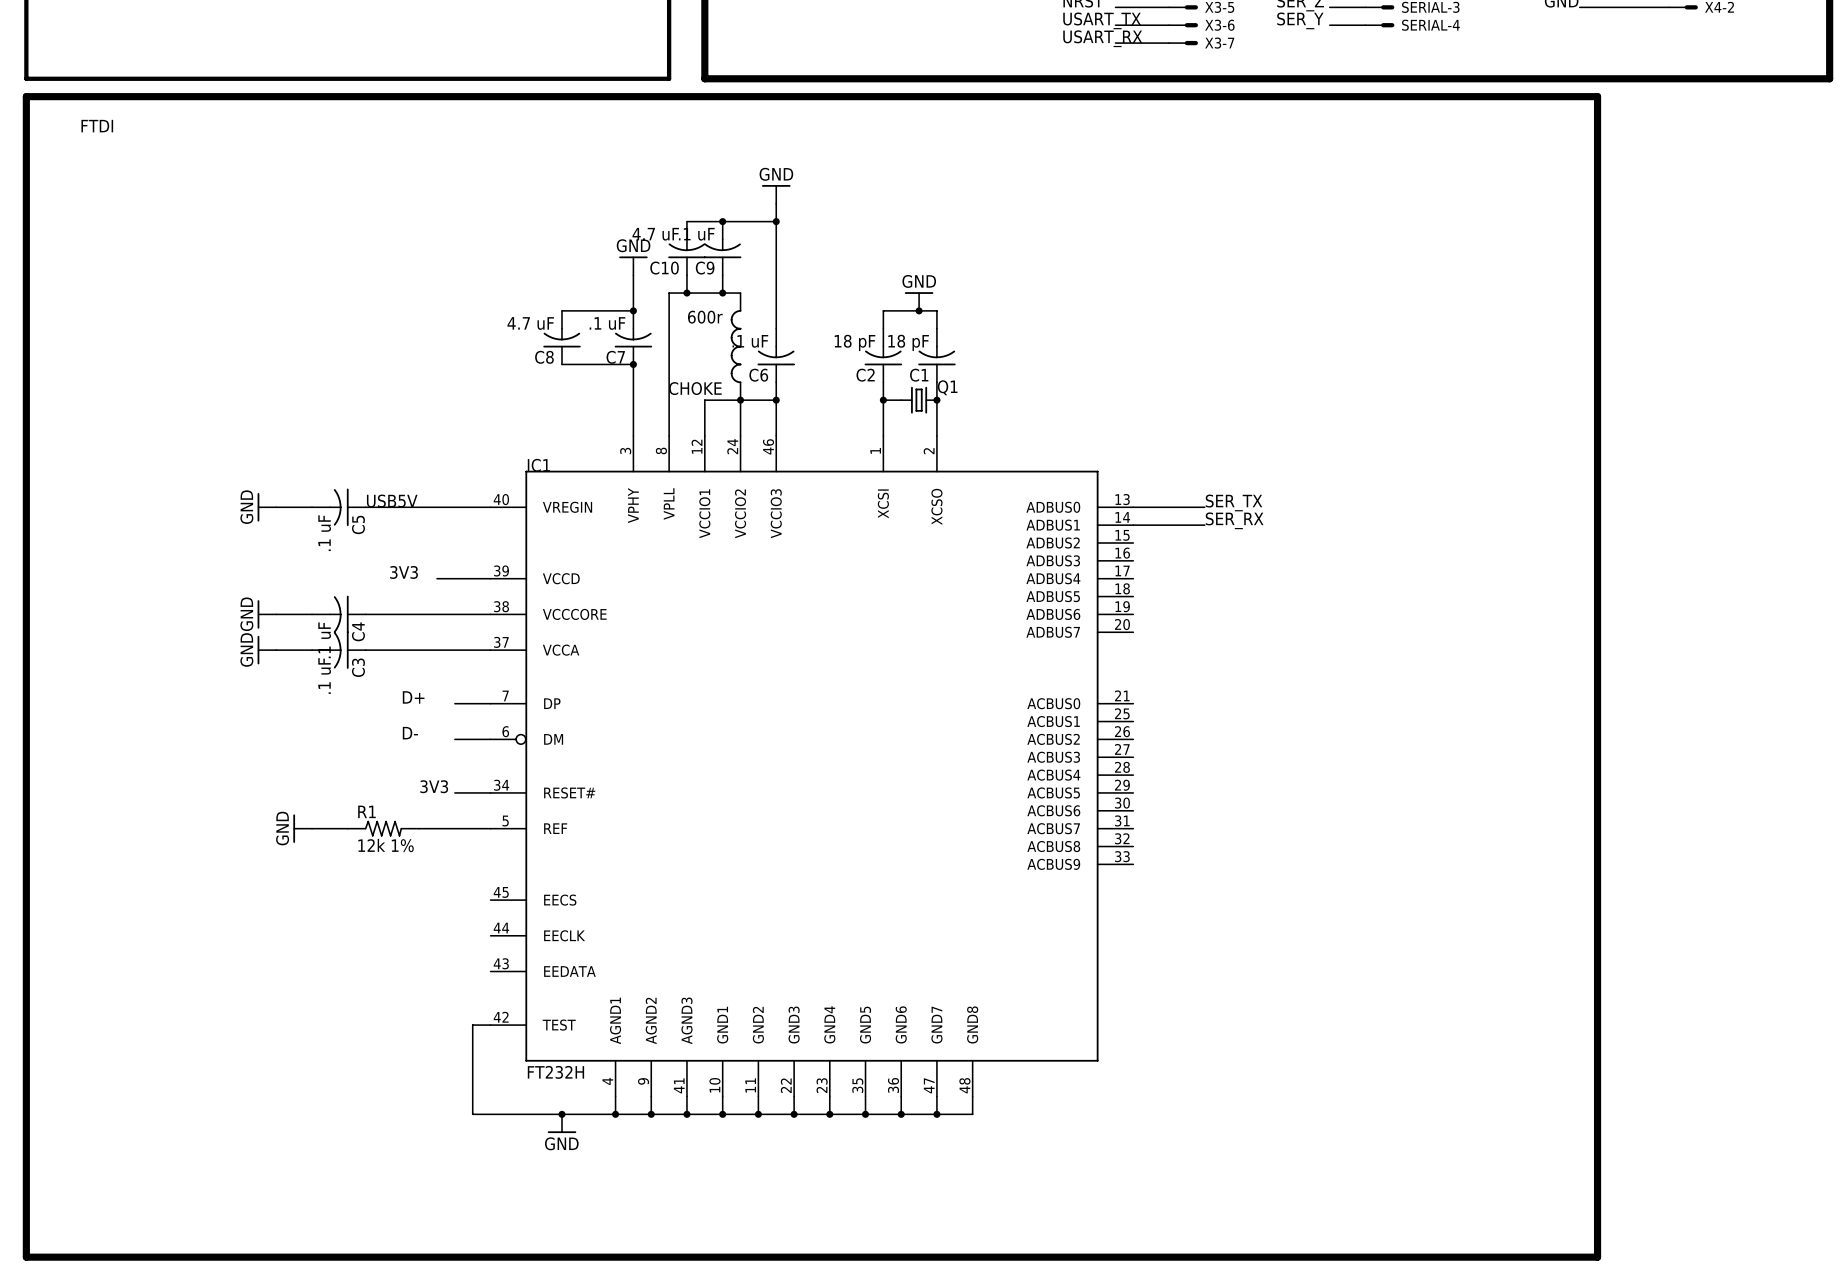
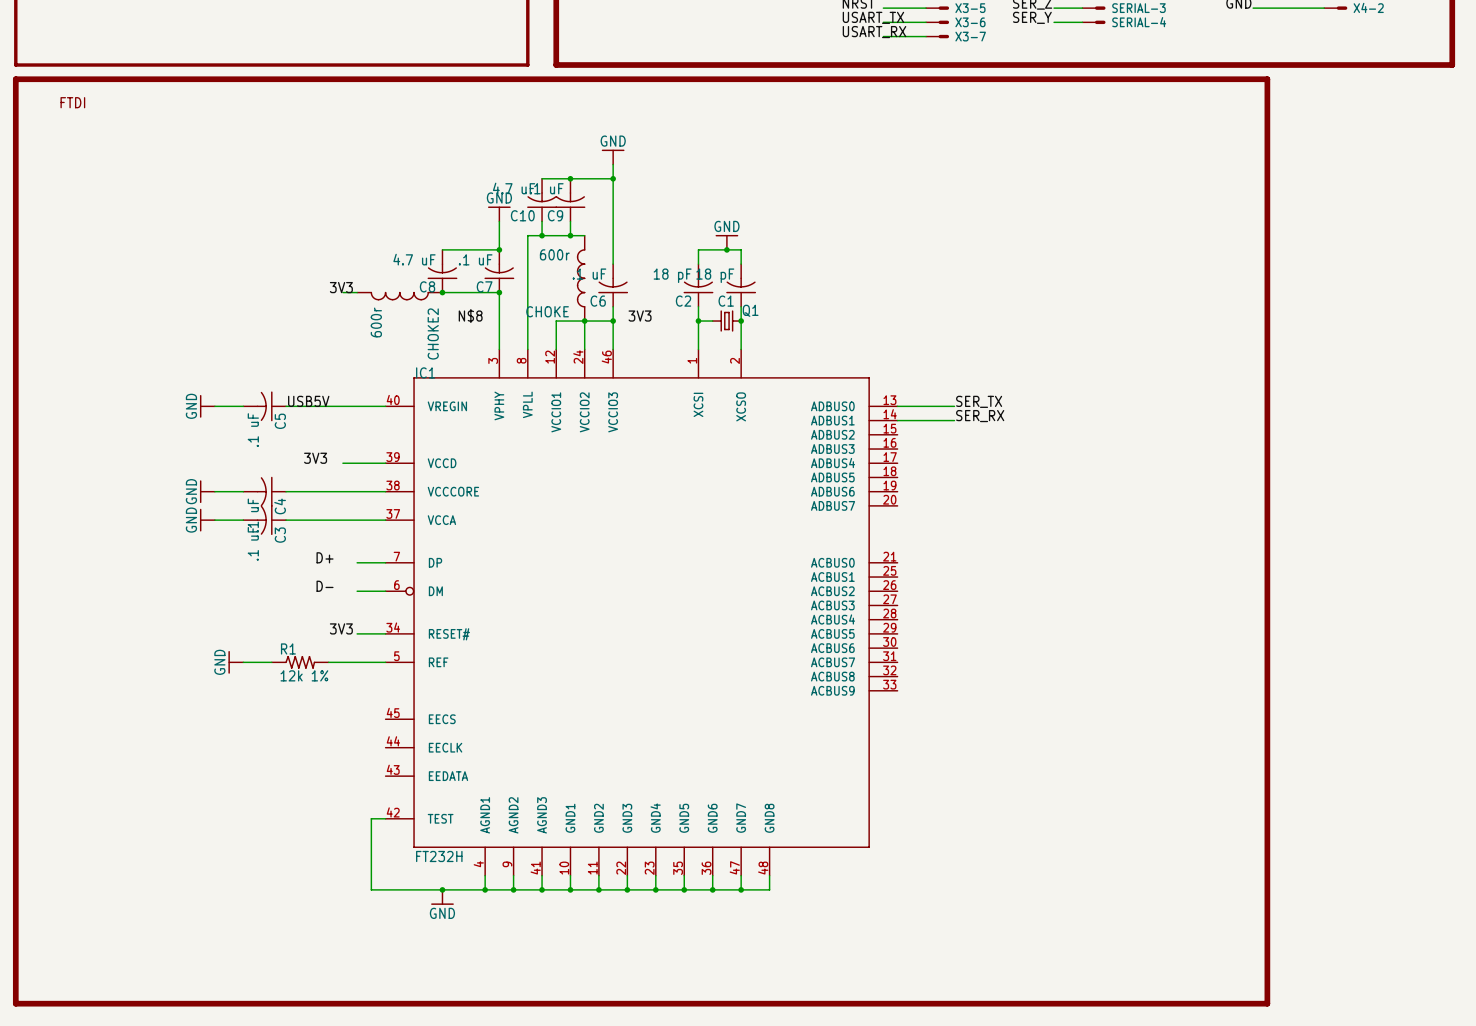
label: none -> 3V3 (341, 287)
wire: none -> (342, 292) (357, 292)
junction: none -> (442, 292)
CHOKE2: none -> 600r (399, 296)
label: none -> 3V3 (640, 316)
label: none -> N$8 (470, 316)

